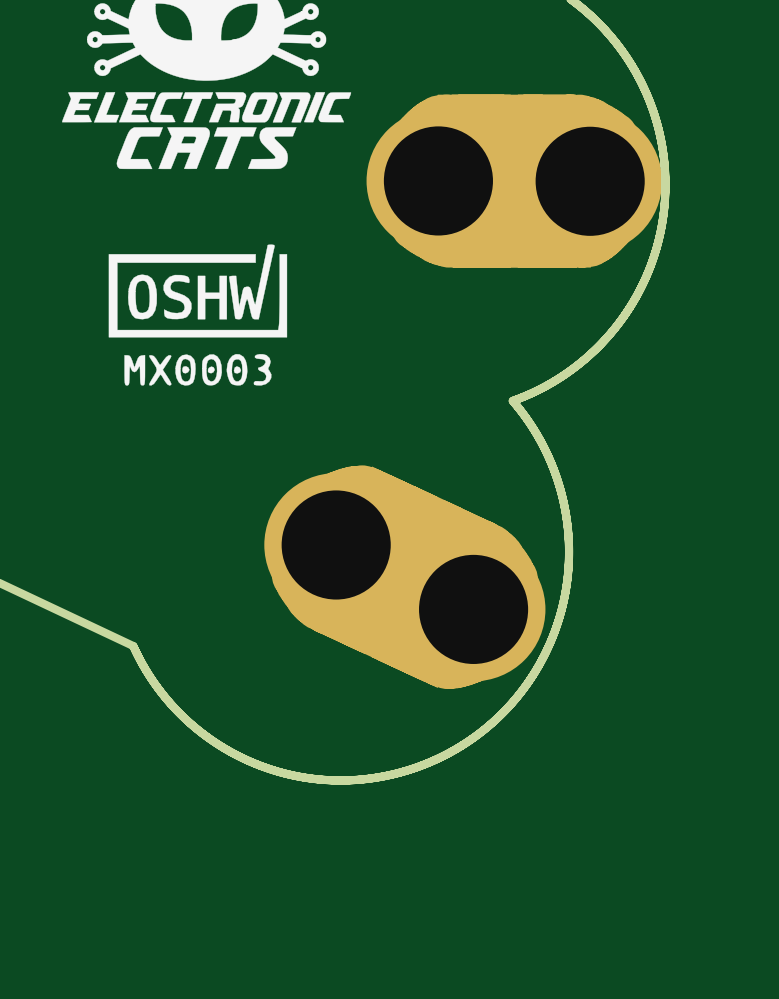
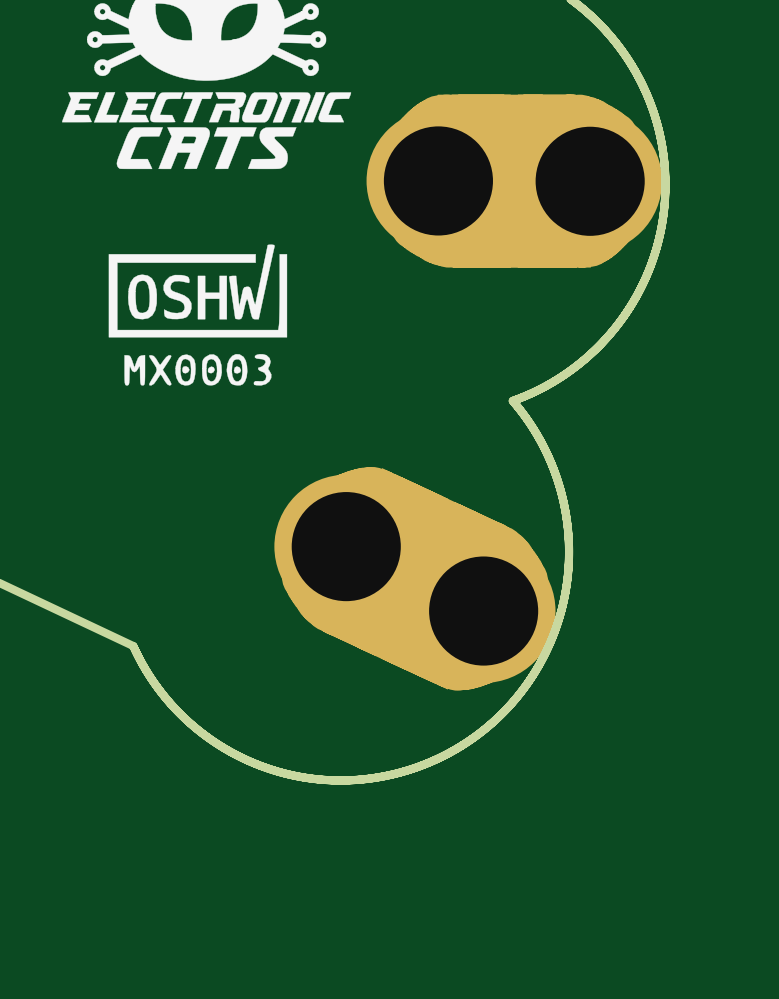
part rotation: 0° (404, 577) -> 180° (414, 578)

